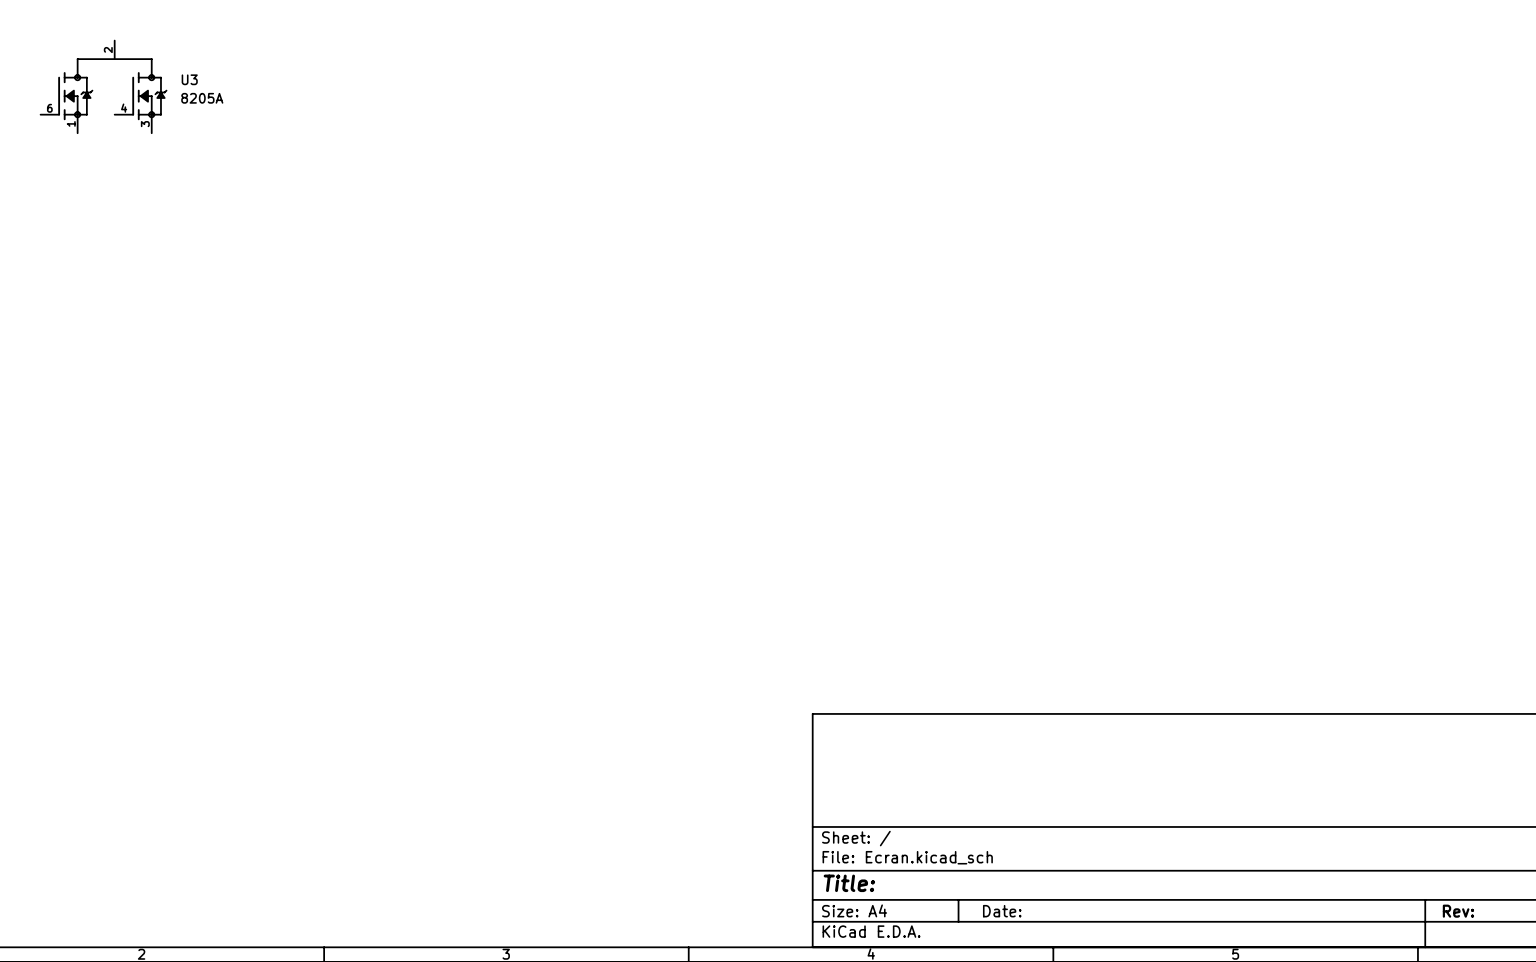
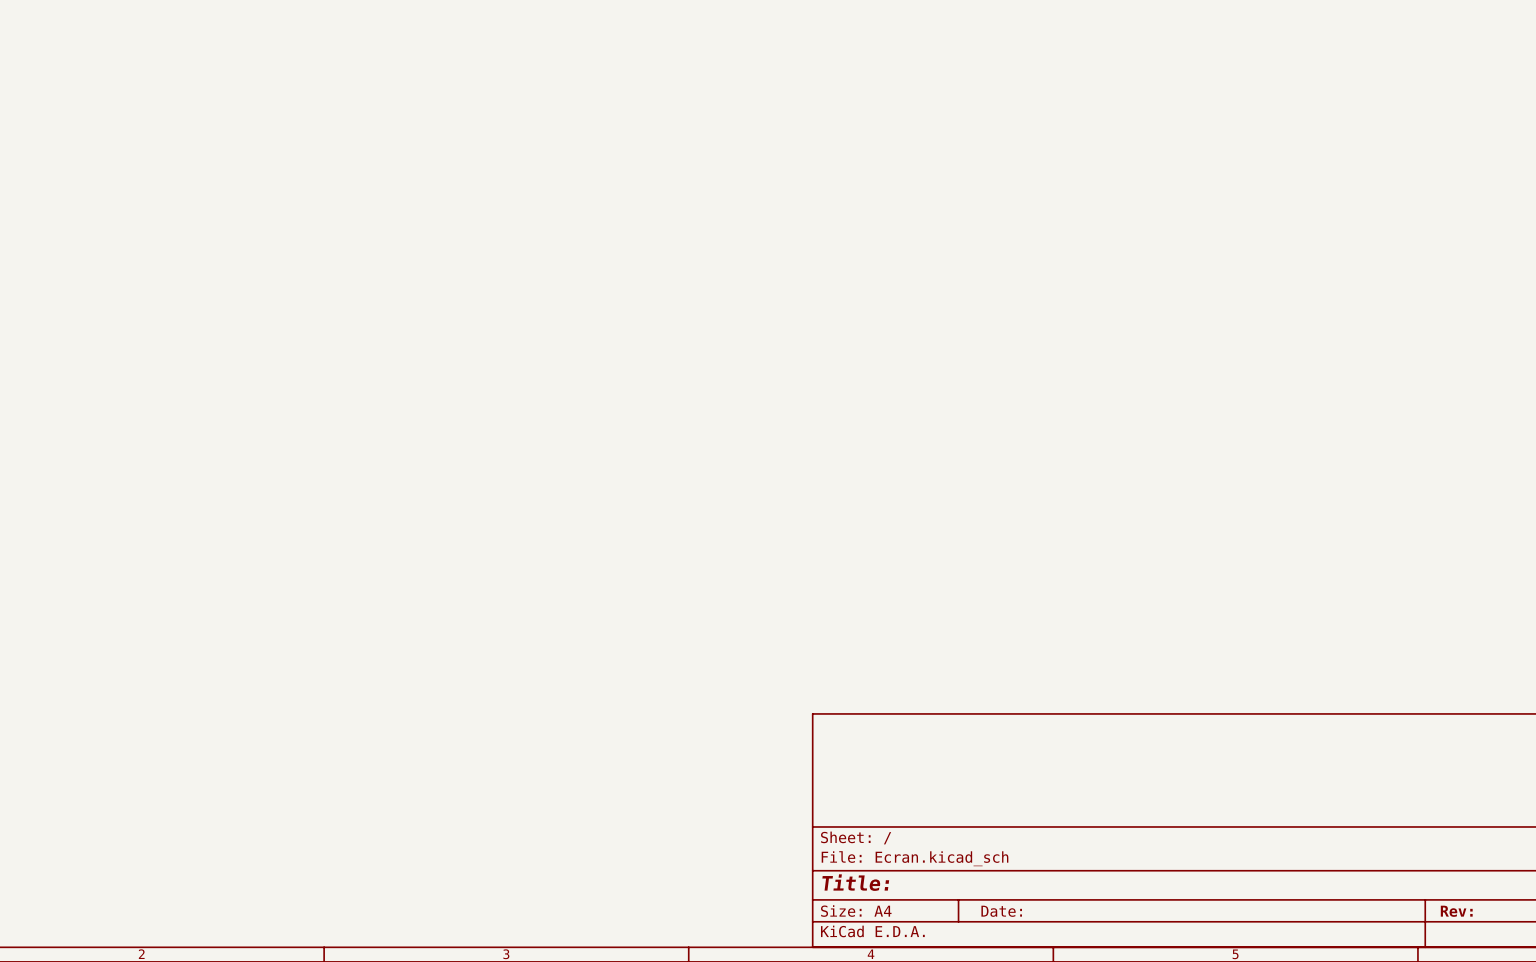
U3: 8205A (103, 86) -> none

